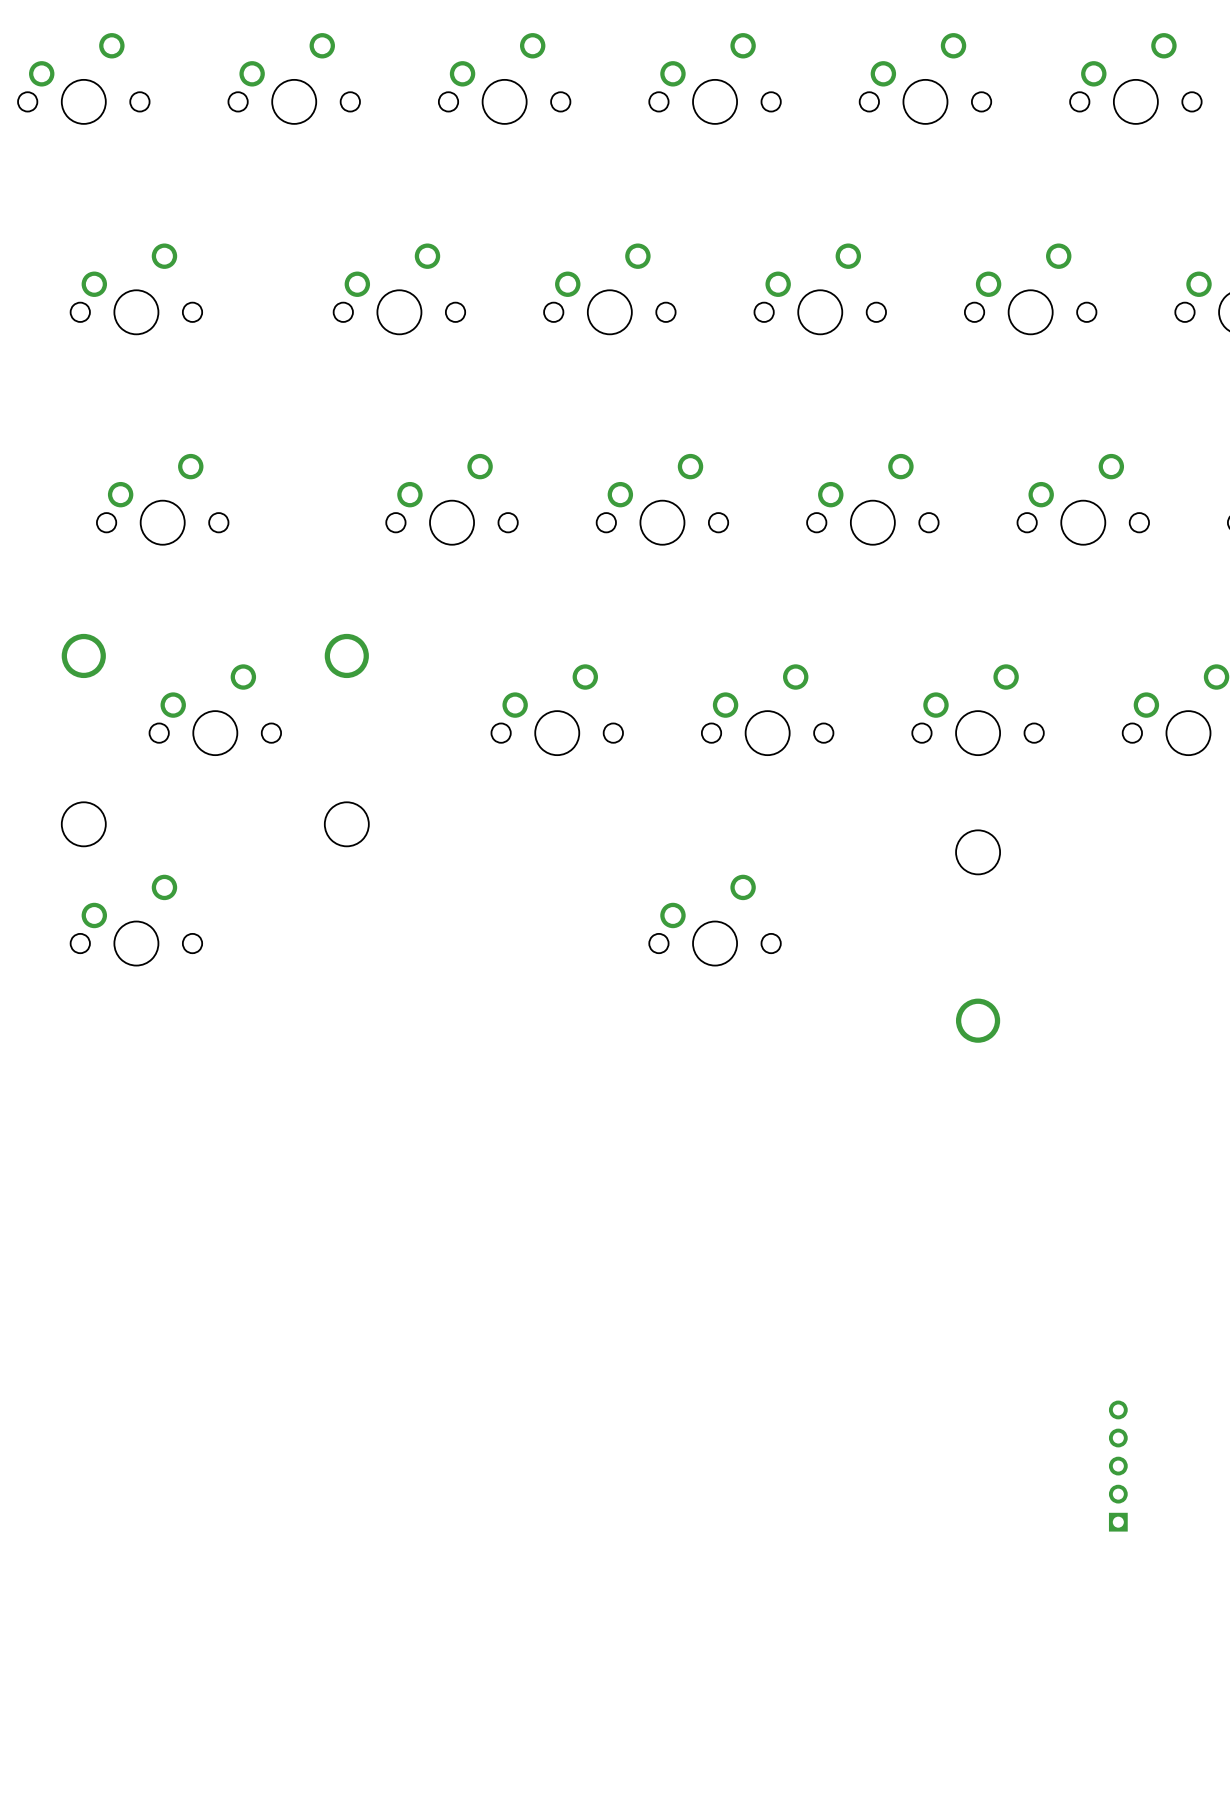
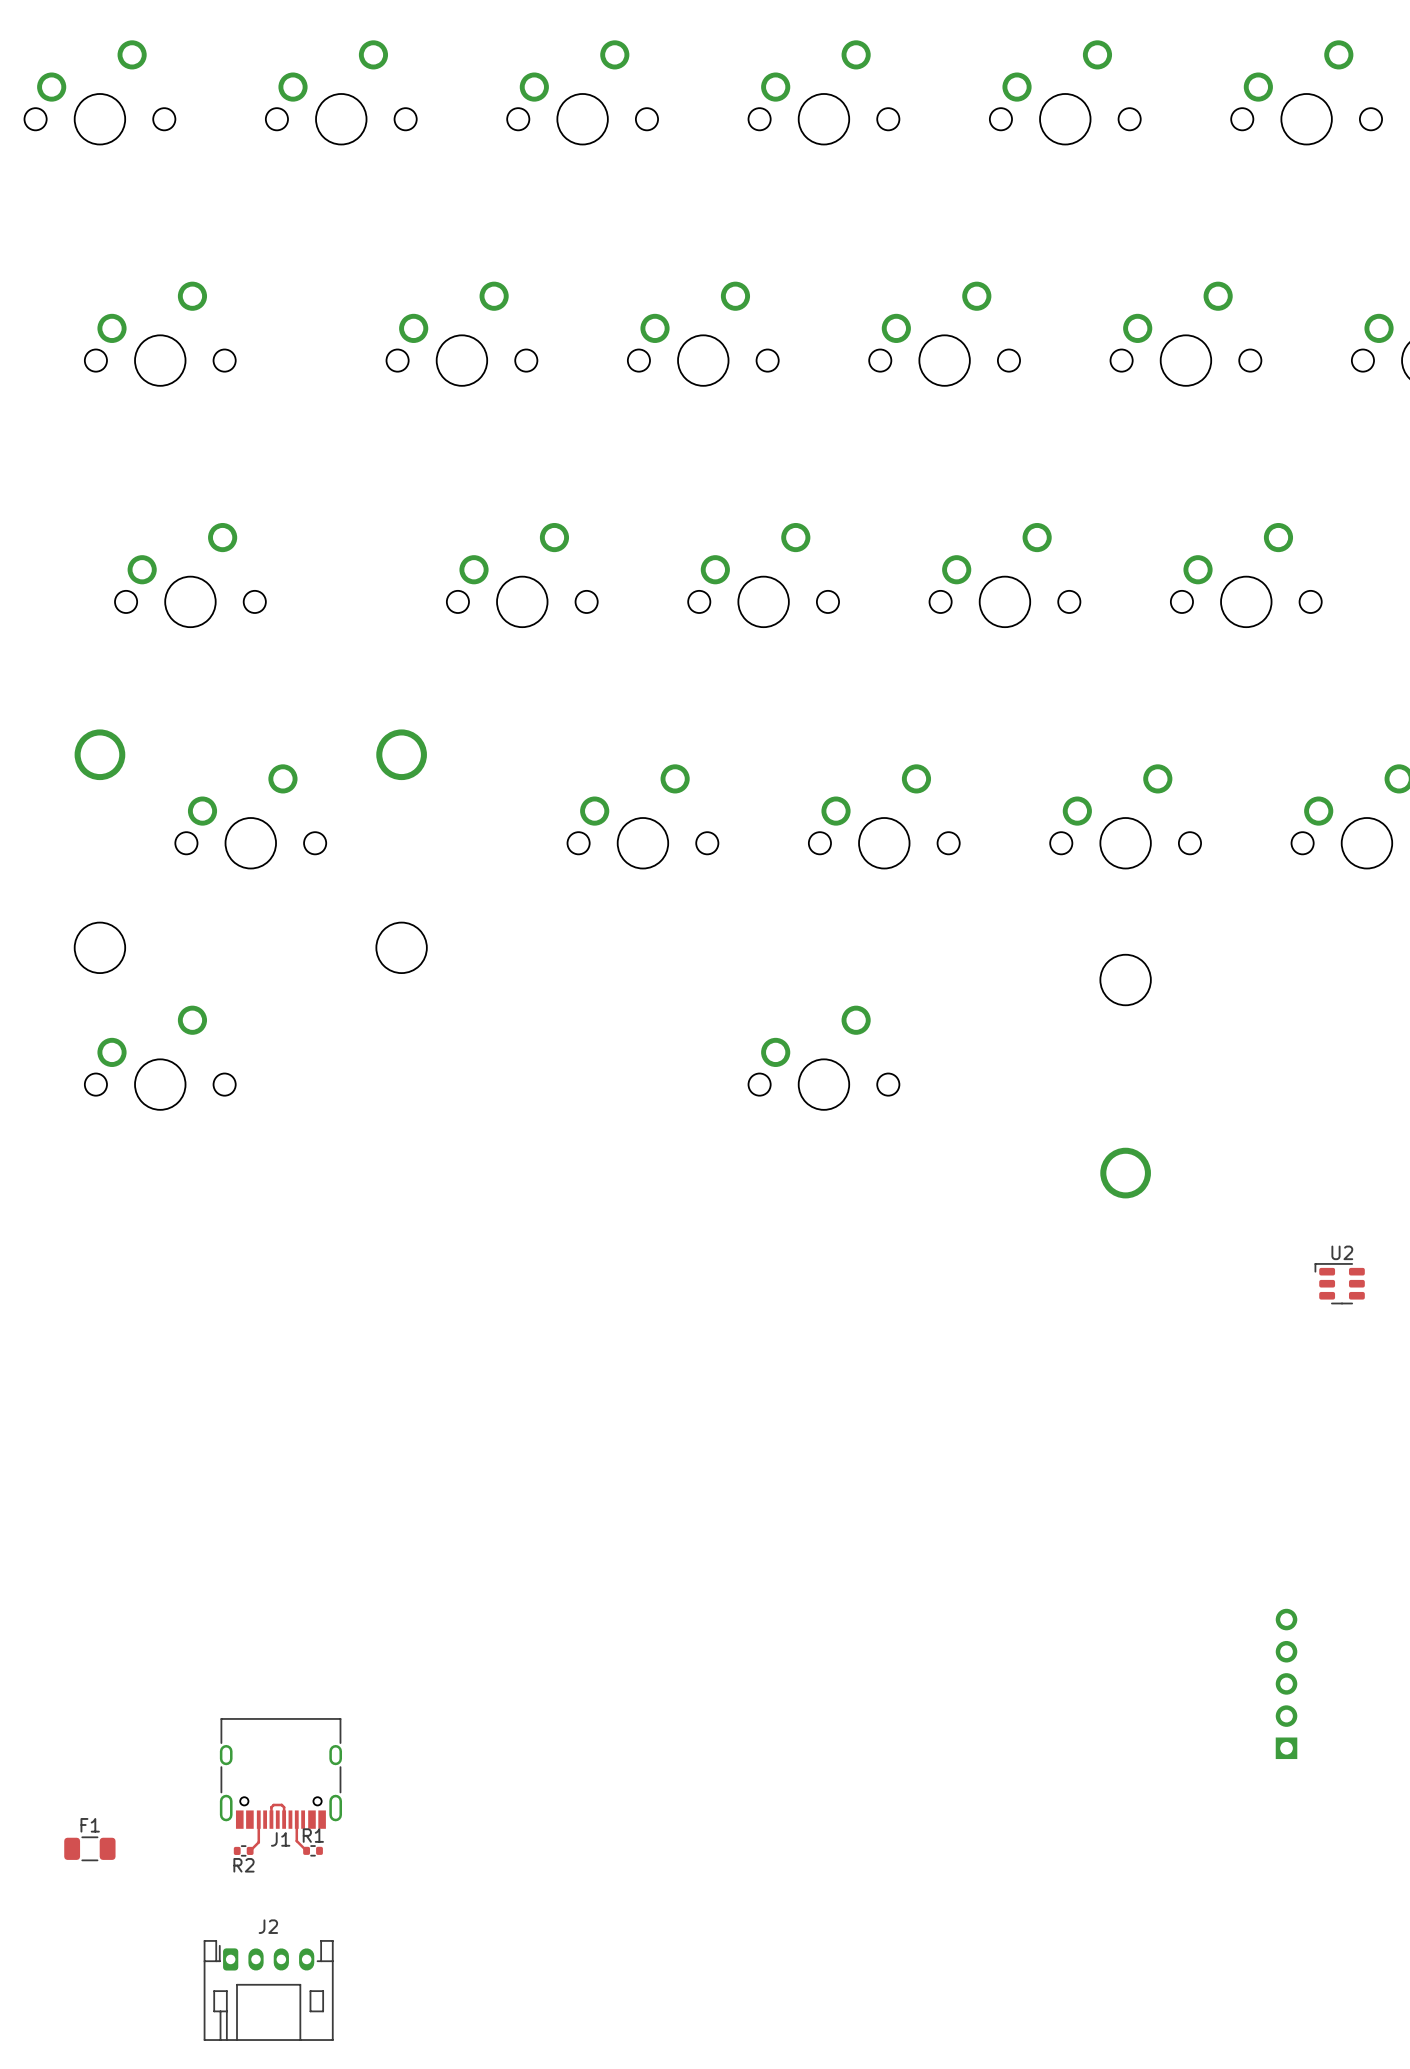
U2: none -> (1339, 1283)
J1: none -> (280, 1773)
track: none -> (258, 1819) (258, 1842) (250, 1850)
track: none -> (271, 1819) (271, 1807) (273, 1804) (281, 1804) (284, 1807) (284, 1819)
track: none -> (296, 1819) (296, 1841) (306, 1850)
F1: none -> (89, 1848)
R2: none -> (243, 1850)
R1: none -> (313, 1850)
J2: none -> (268, 1990)

